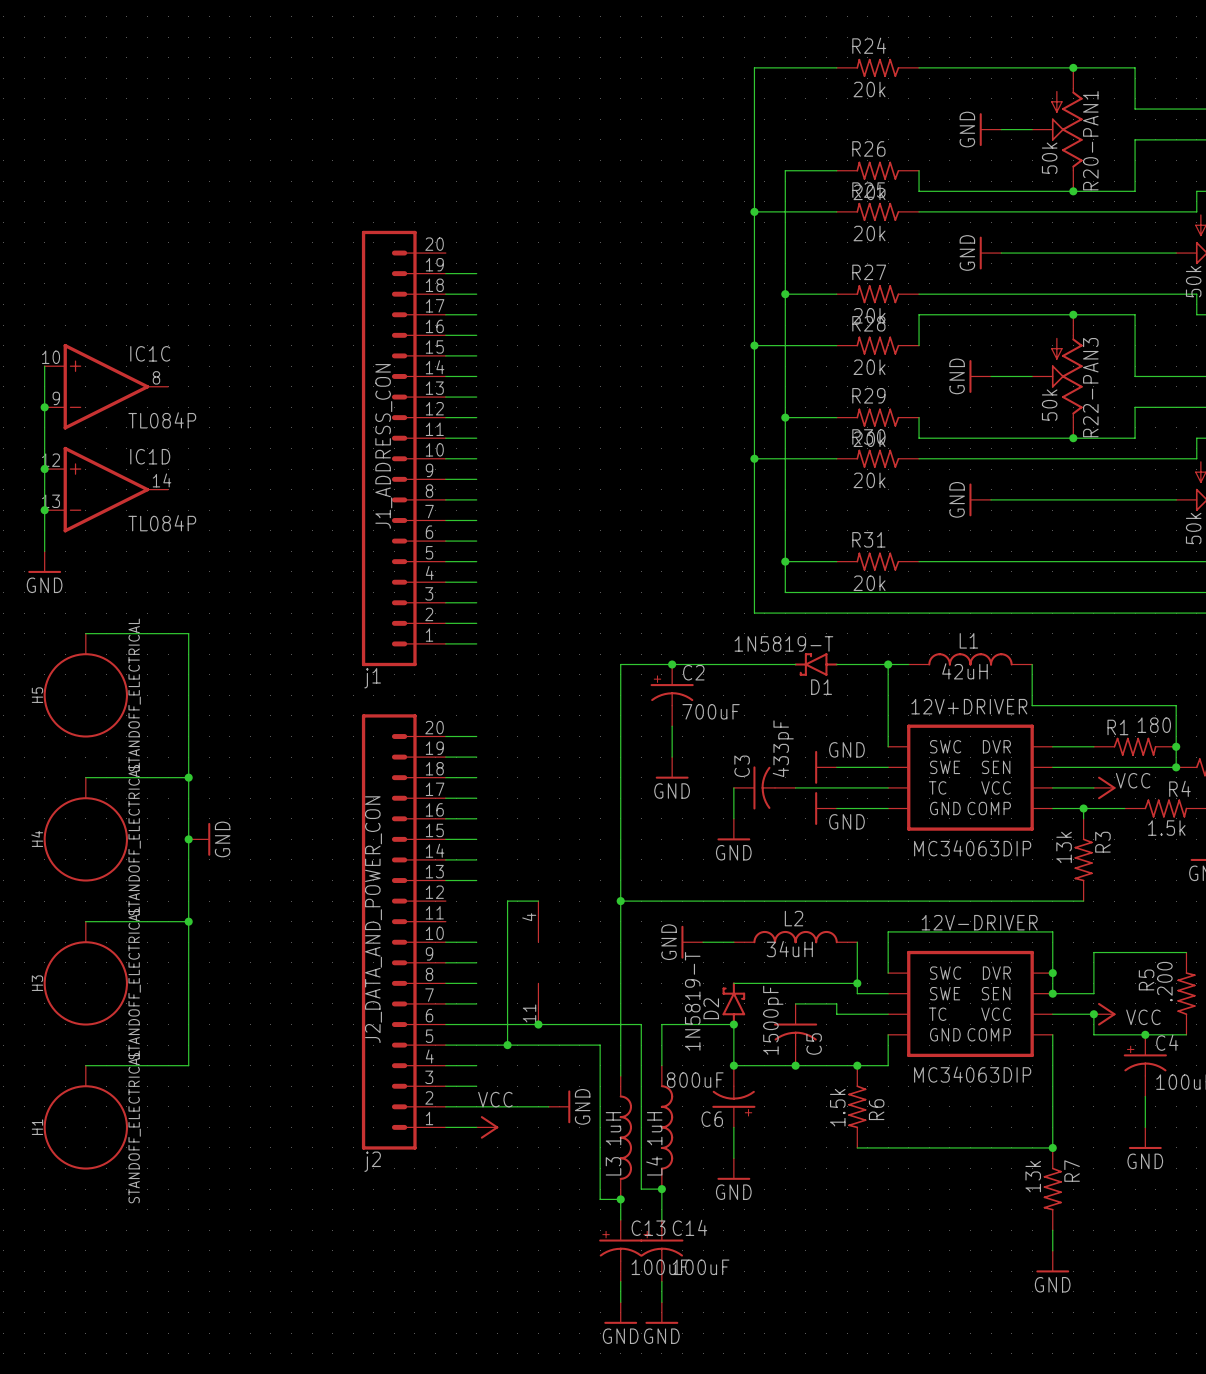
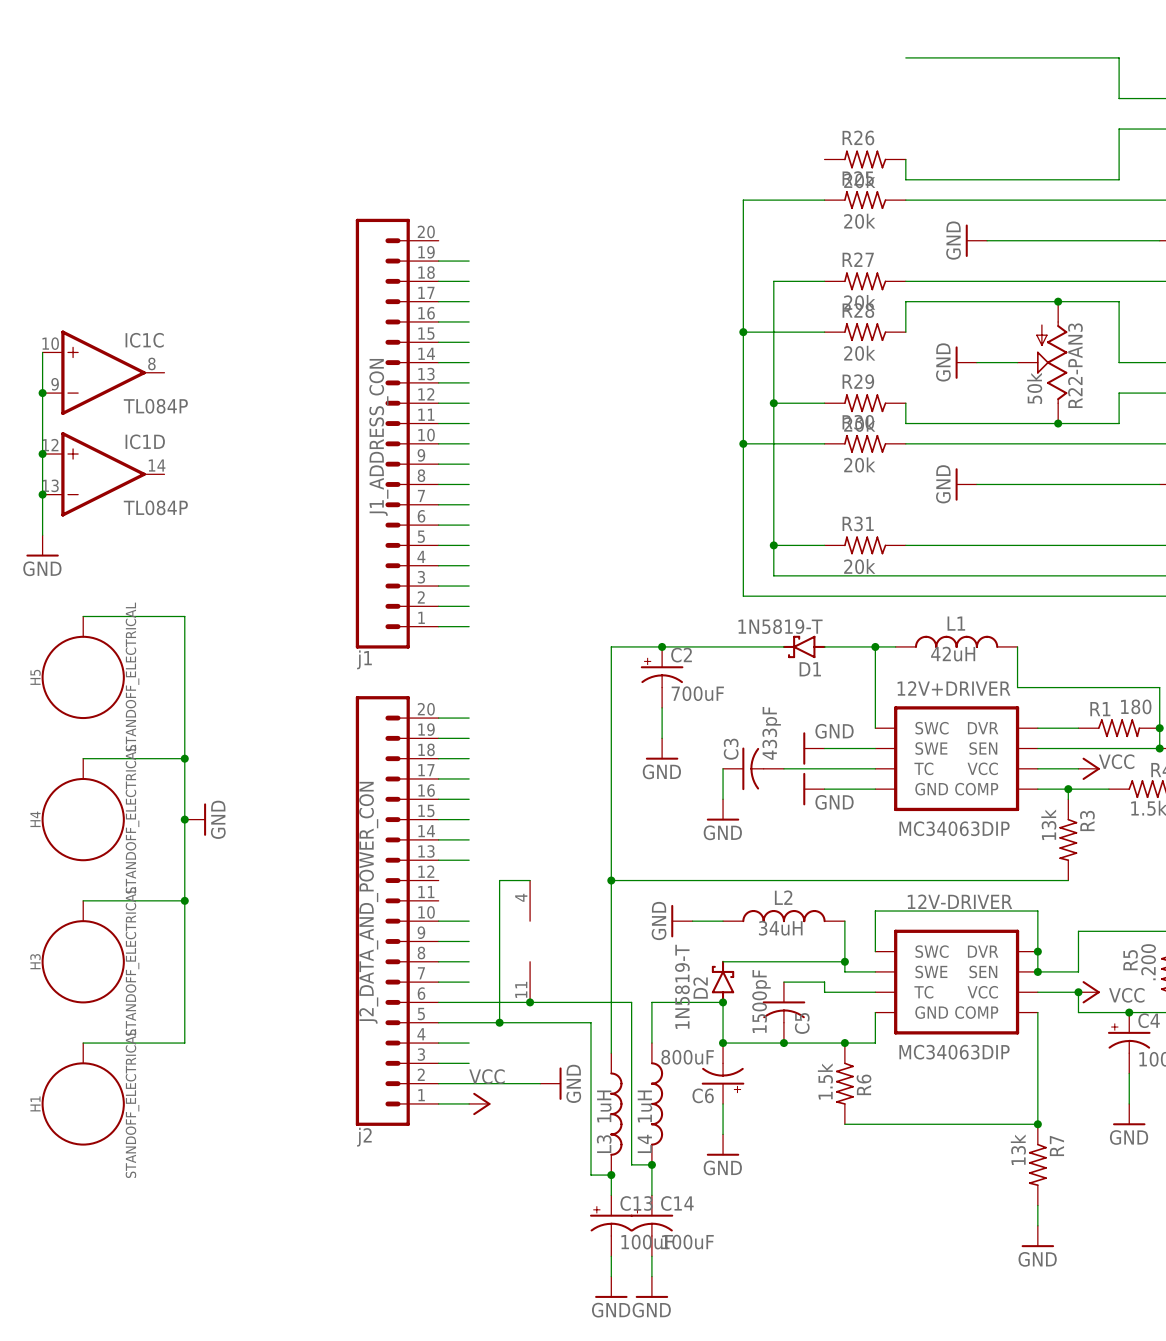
wire: (836, 67) (754, 67) (754, 211) -> none
R24: 20k (877, 67) -> none
junction: (1073, 67) -> none
power symbol: GND (990, 129) -> none
wire: (1001, 129) (1032, 129) -> none
R20-PAN1: 50k (1057, 129) -> none
wire: (836, 170) (785, 170) (785, 294) -> none
junction: (1073, 191) -> none
junction: (754, 211) -> none
junction: (785, 294) -> none

